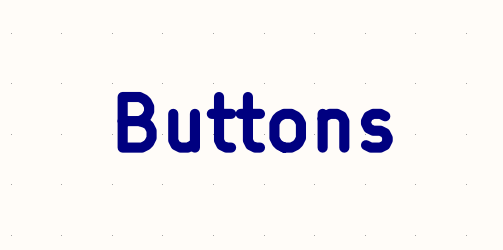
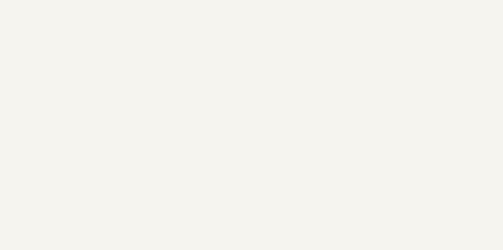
text: Buttons (255, 122) -> none

